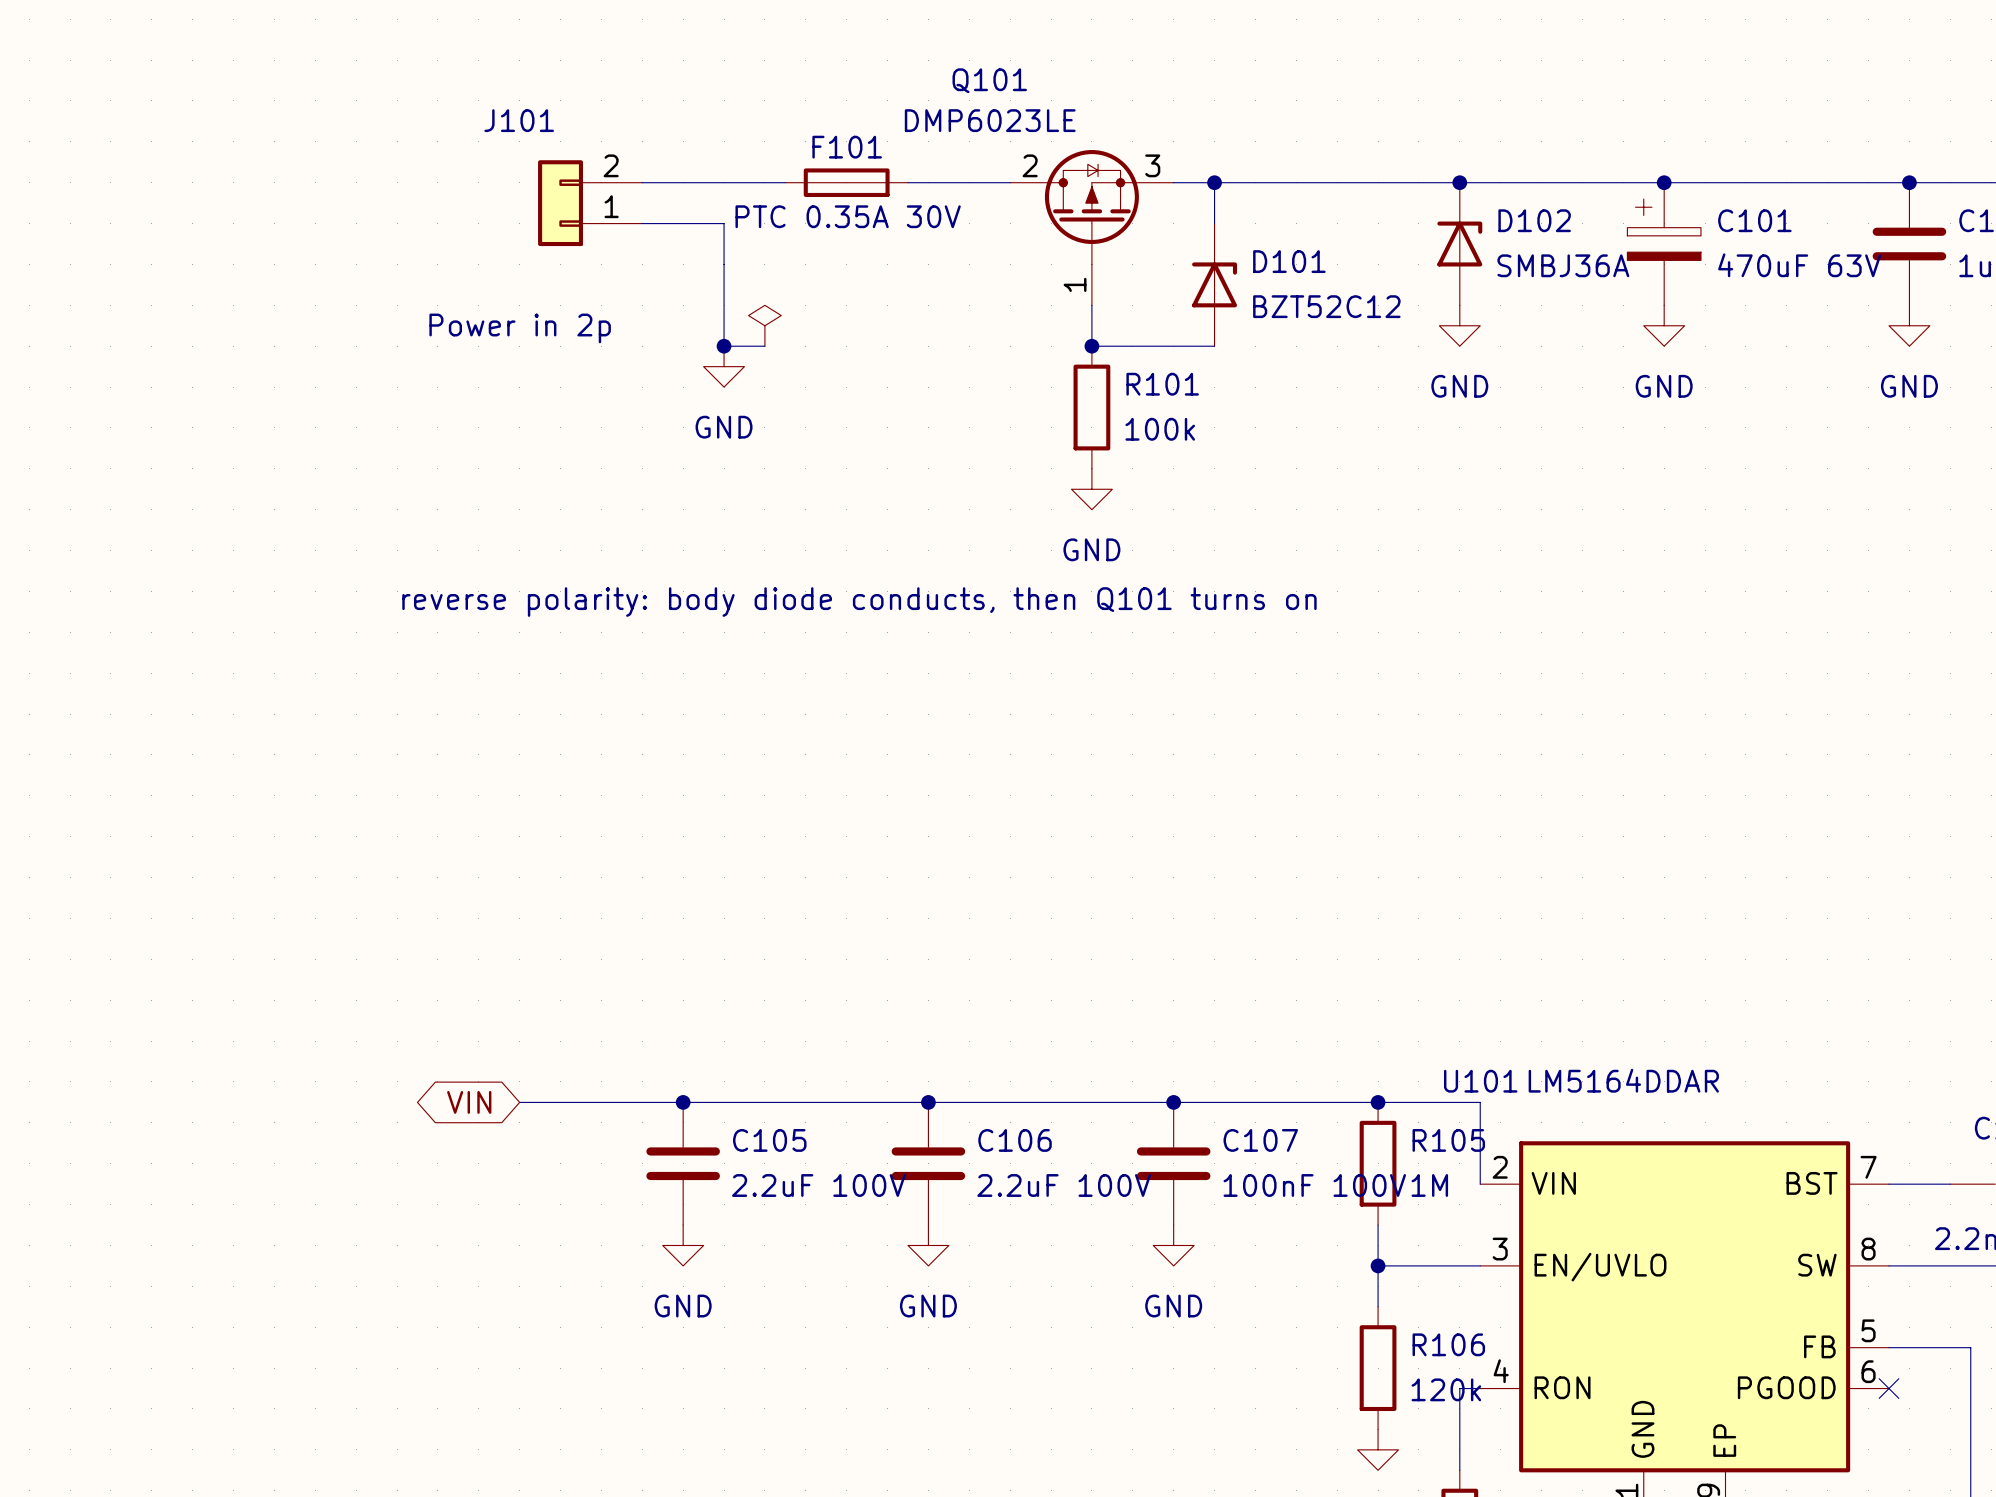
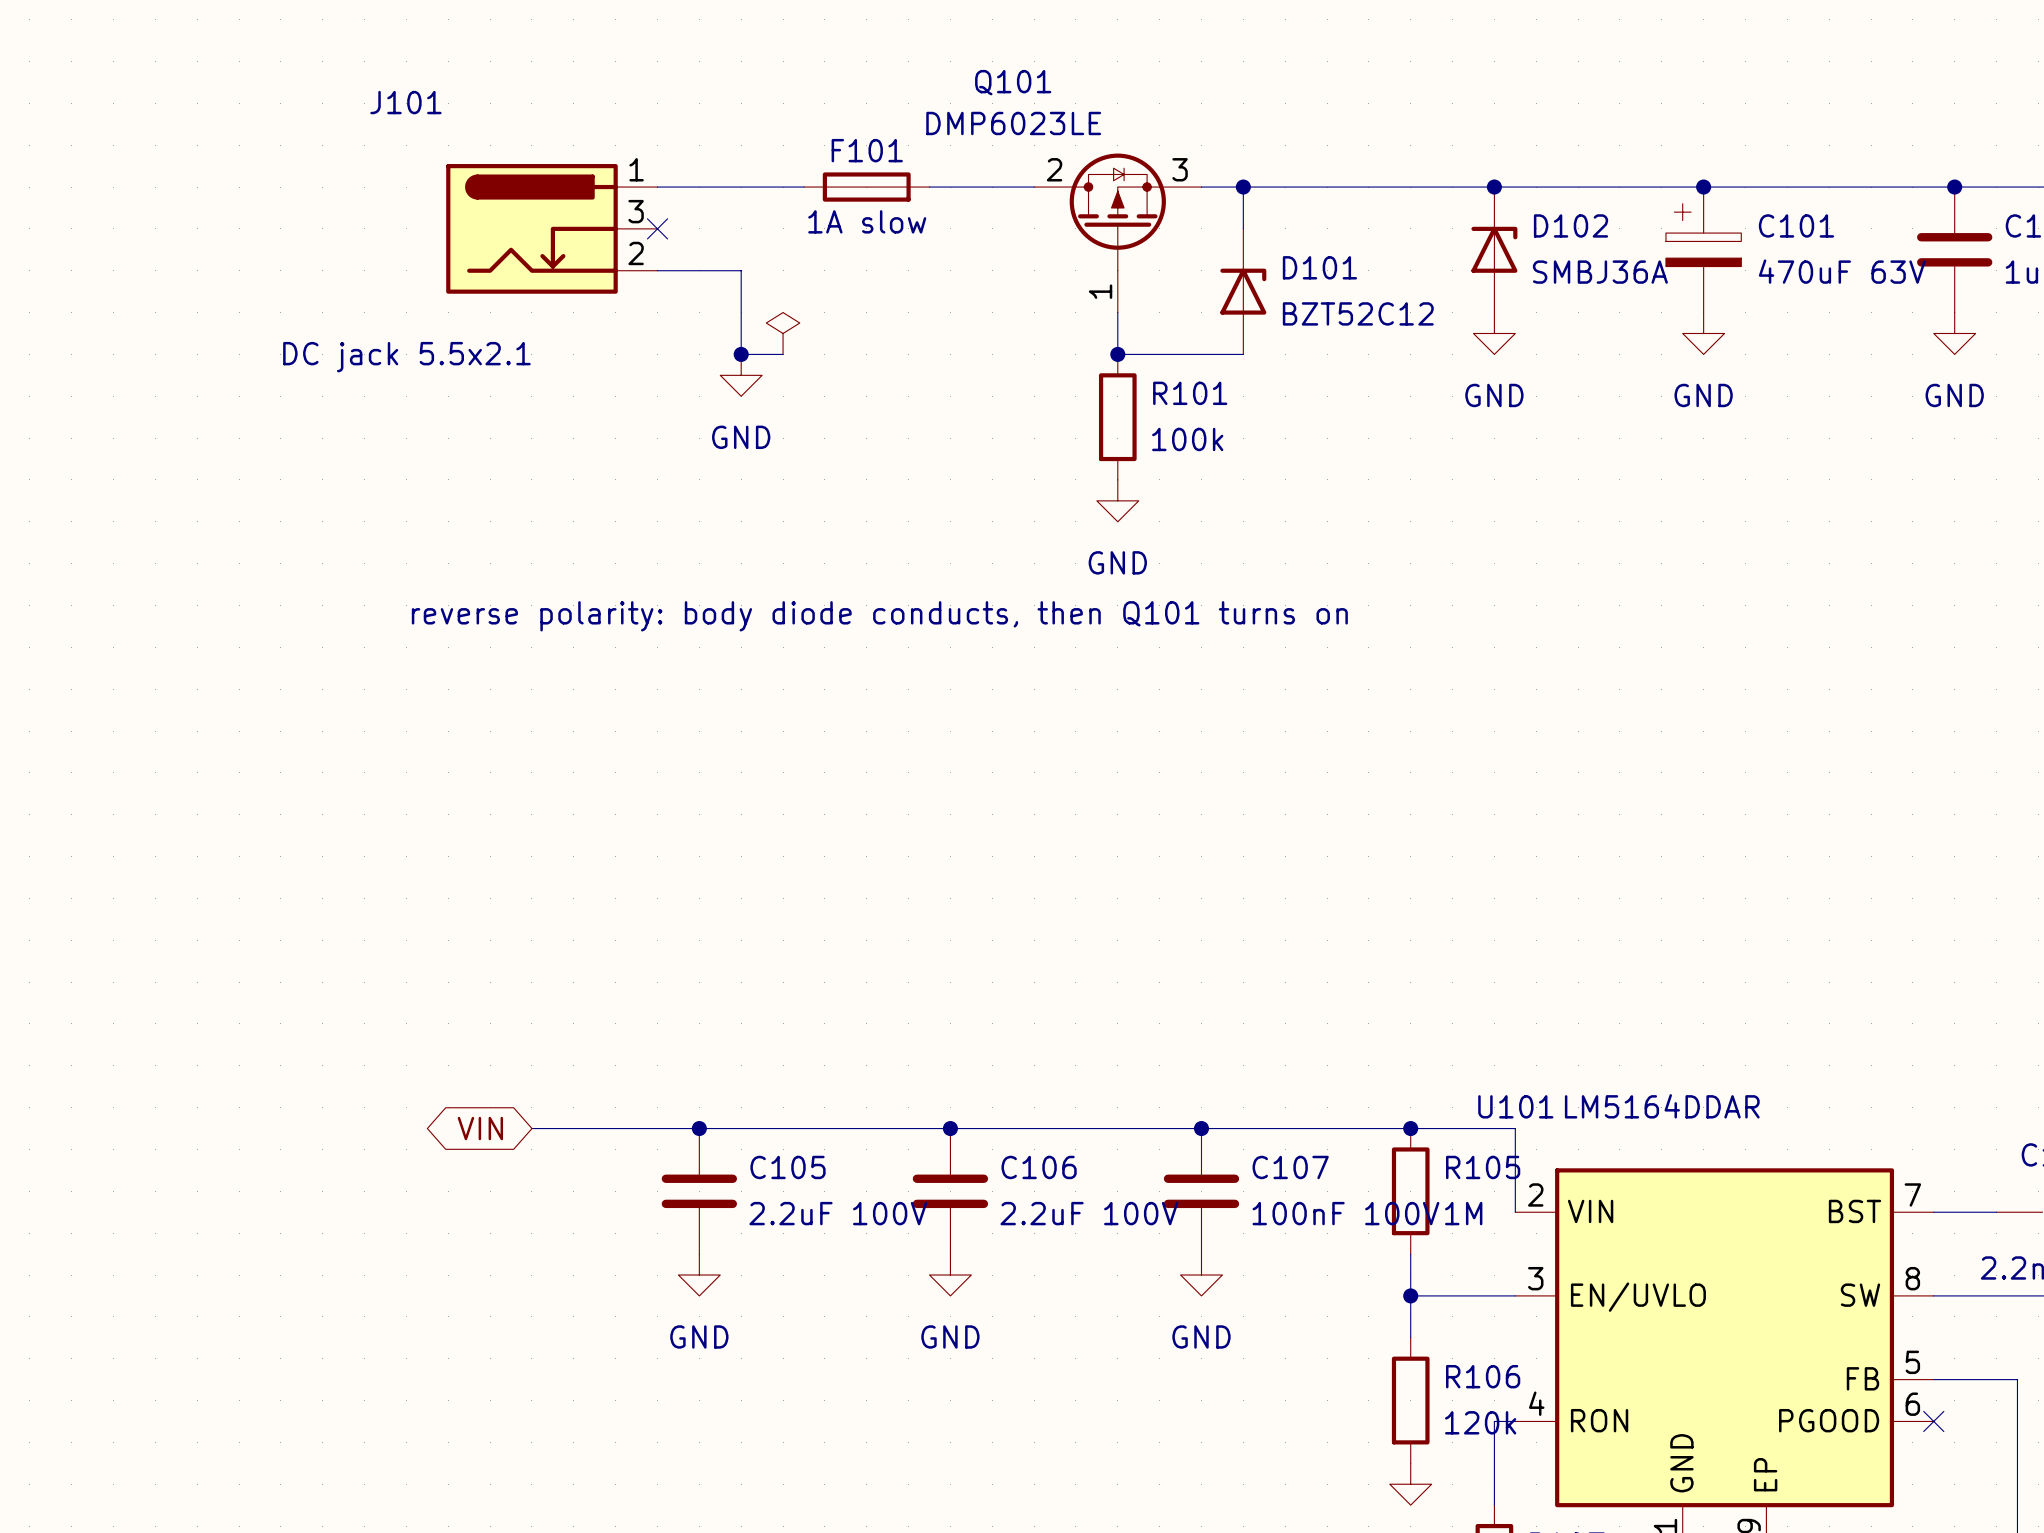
J101 name position: J101 (519, 120) -> J101 (405, 102)
J101 symbol: [538, 160, 643, 247] -> [446, 164, 658, 294]
F101 value: PTC 0.35A 30V (848, 216) -> 1A slow (867, 221)
wire: (642, 223) (724, 223) (724, 264) -> (657, 270) (741, 270)
no-connect mark: none -> (657, 228)
J101 value: Power in 2p (520, 328) -> DC jack 5.5x2.1 (406, 357)

